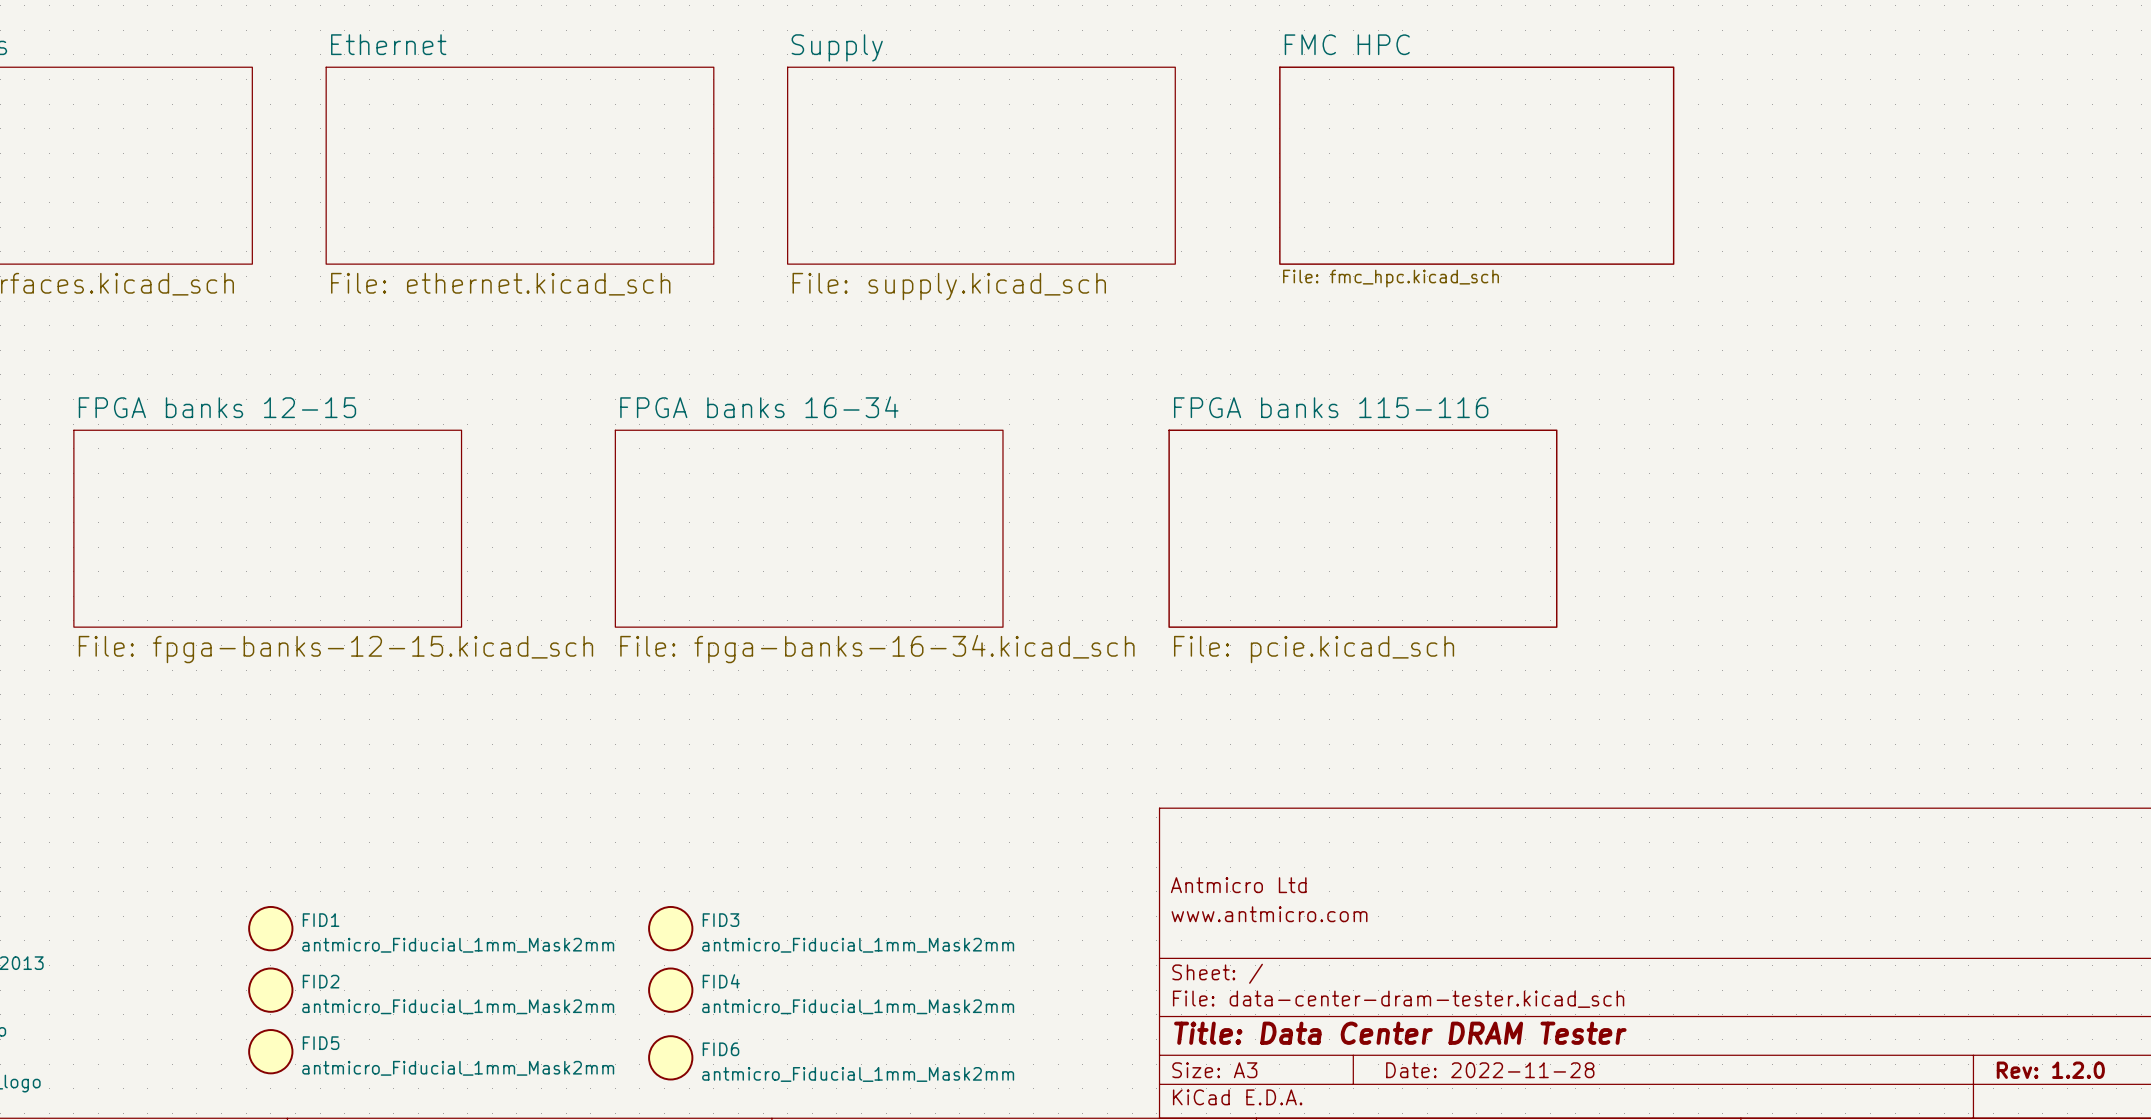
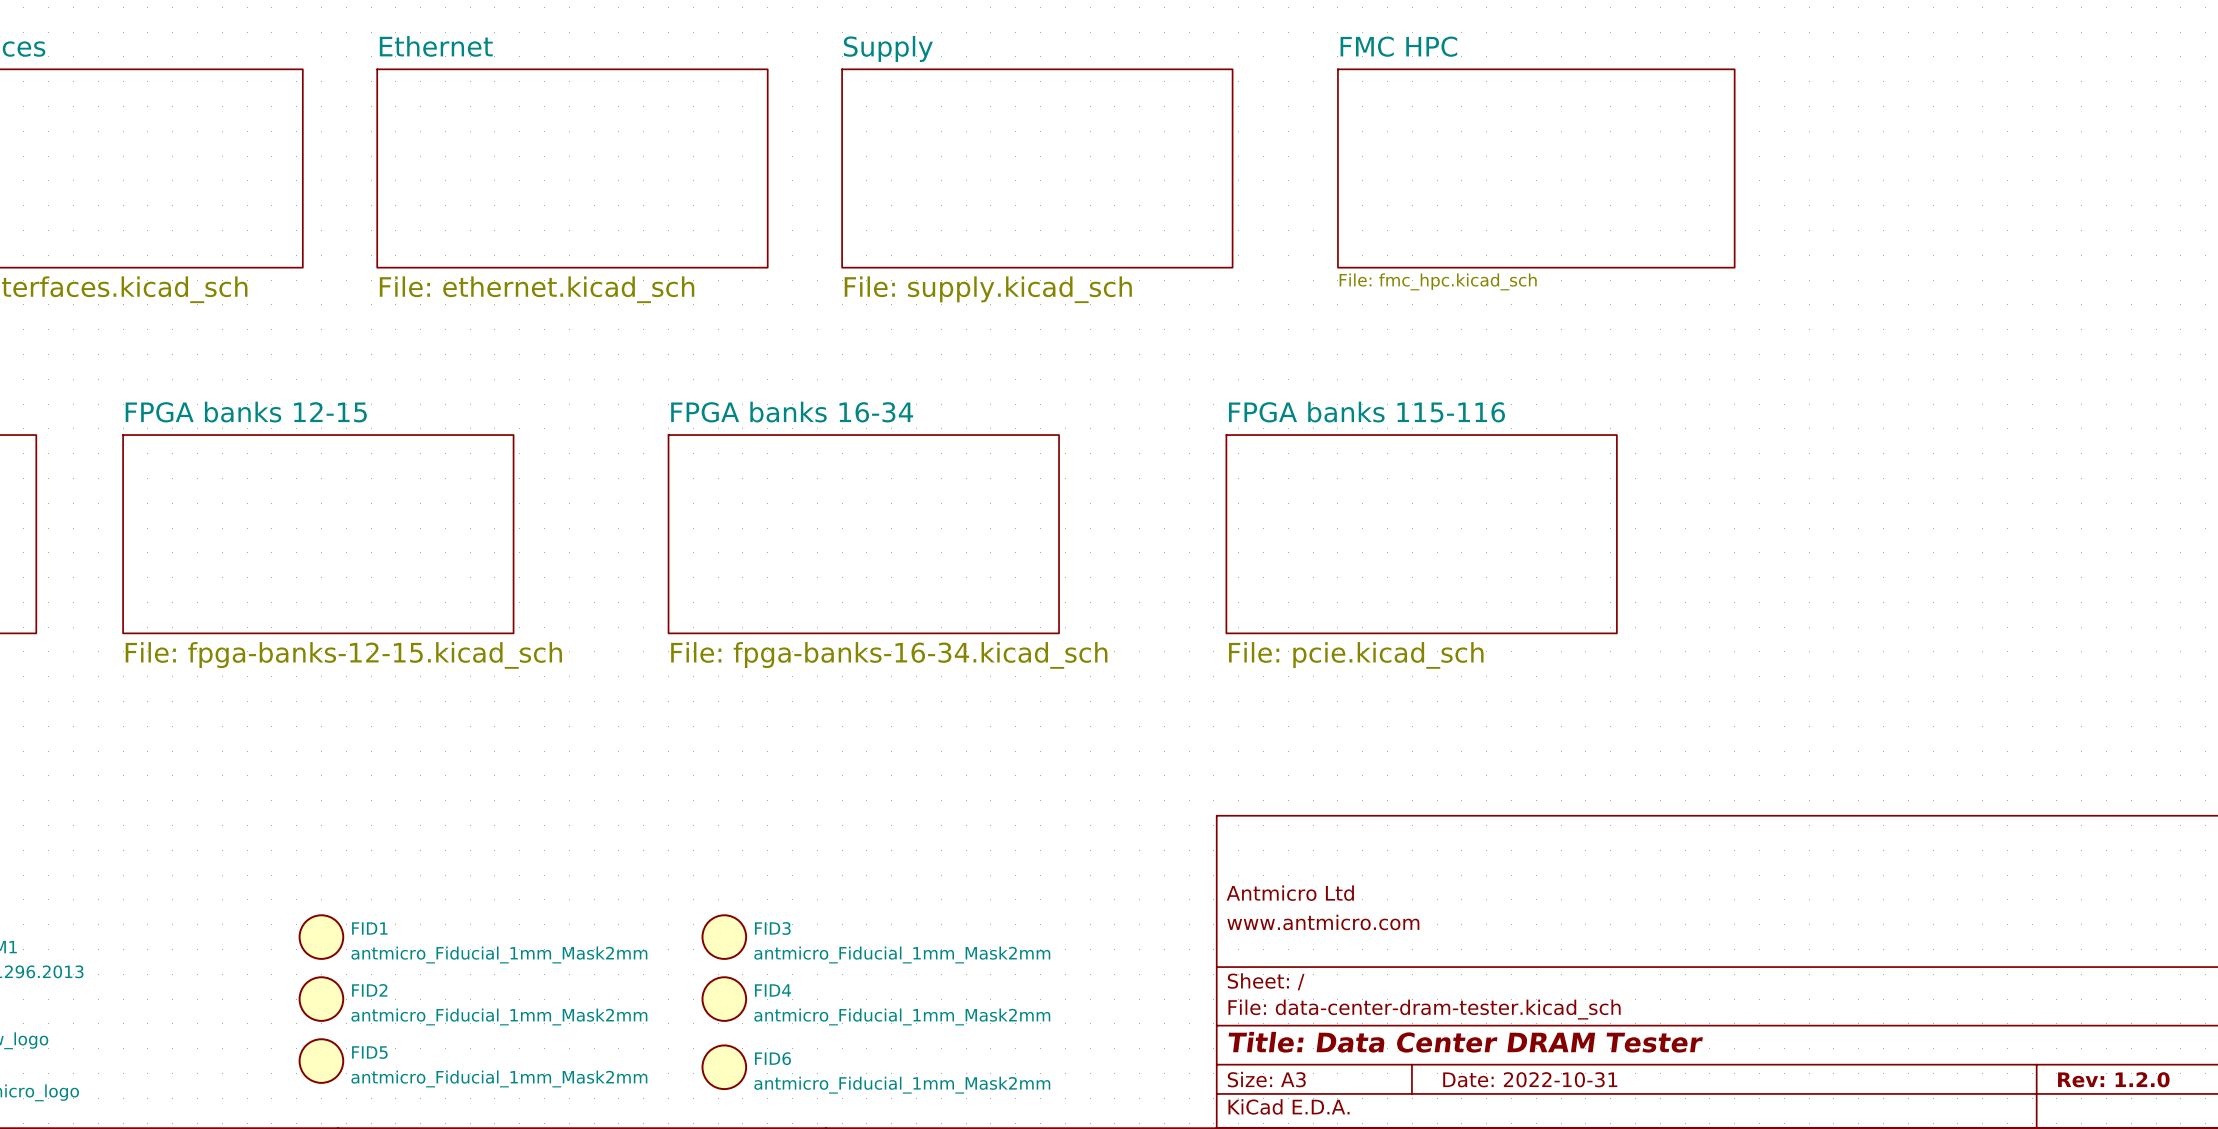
title block: Date: 2022-11-28 (1490, 1070) -> Date: 2022-10-31 (1530, 1079)

